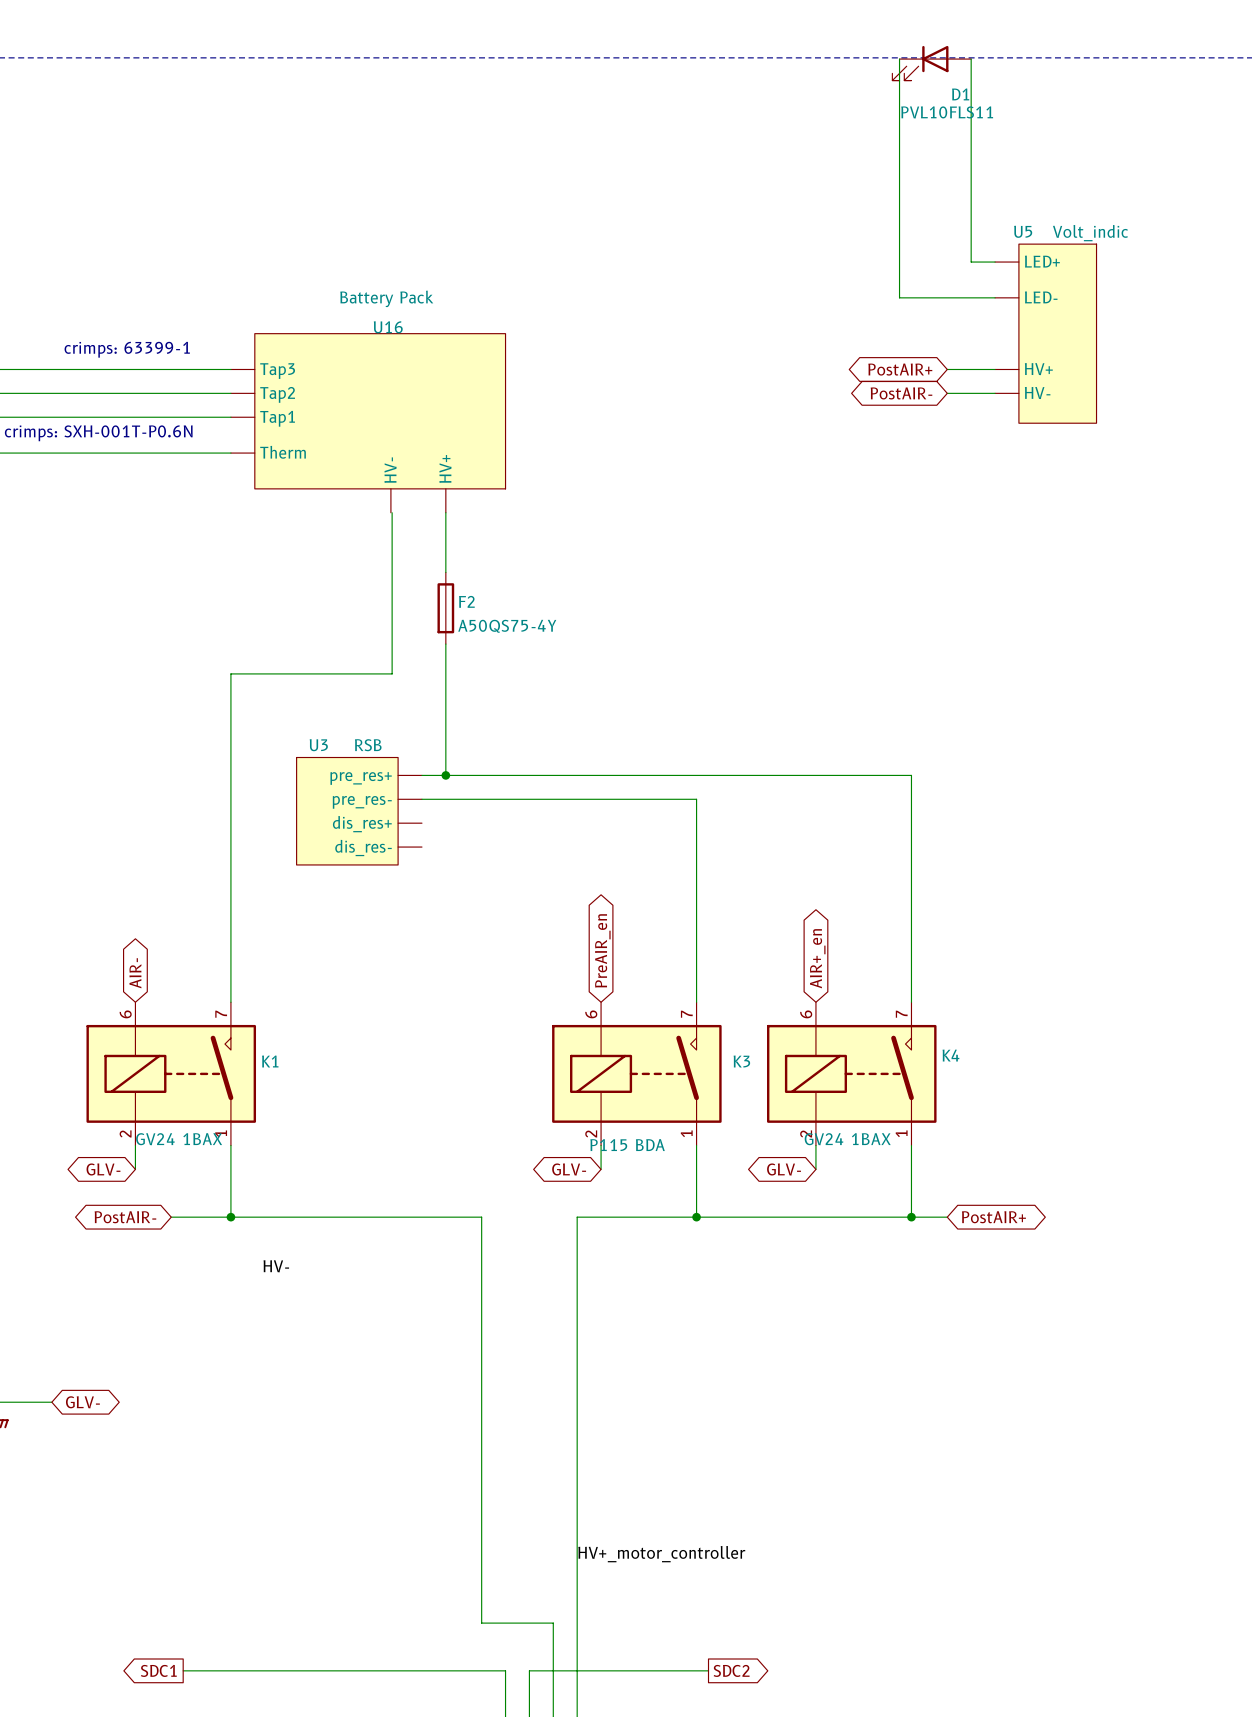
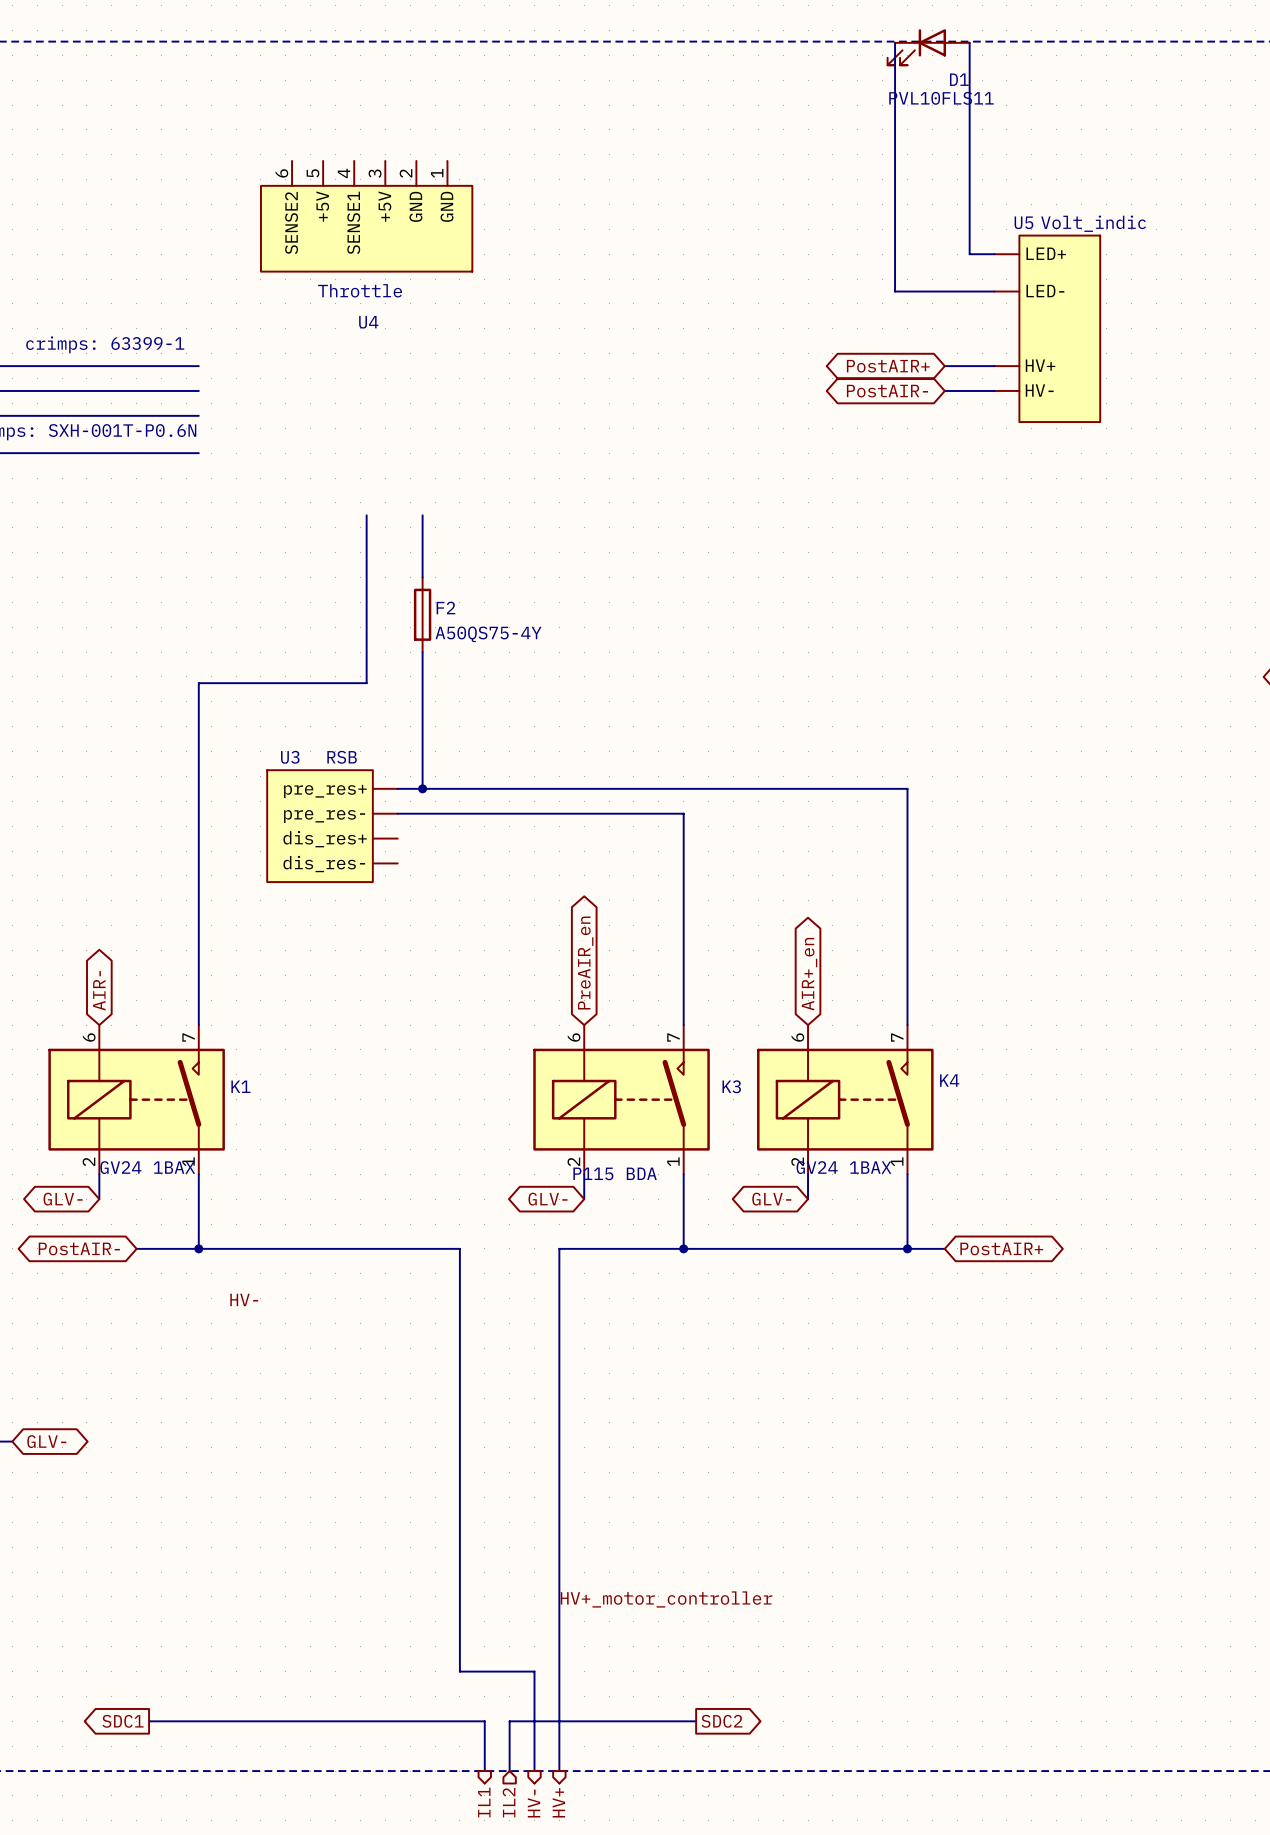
U4: none -> Throttle (366, 216)
U16: Battery Pack (368, 423) -> none

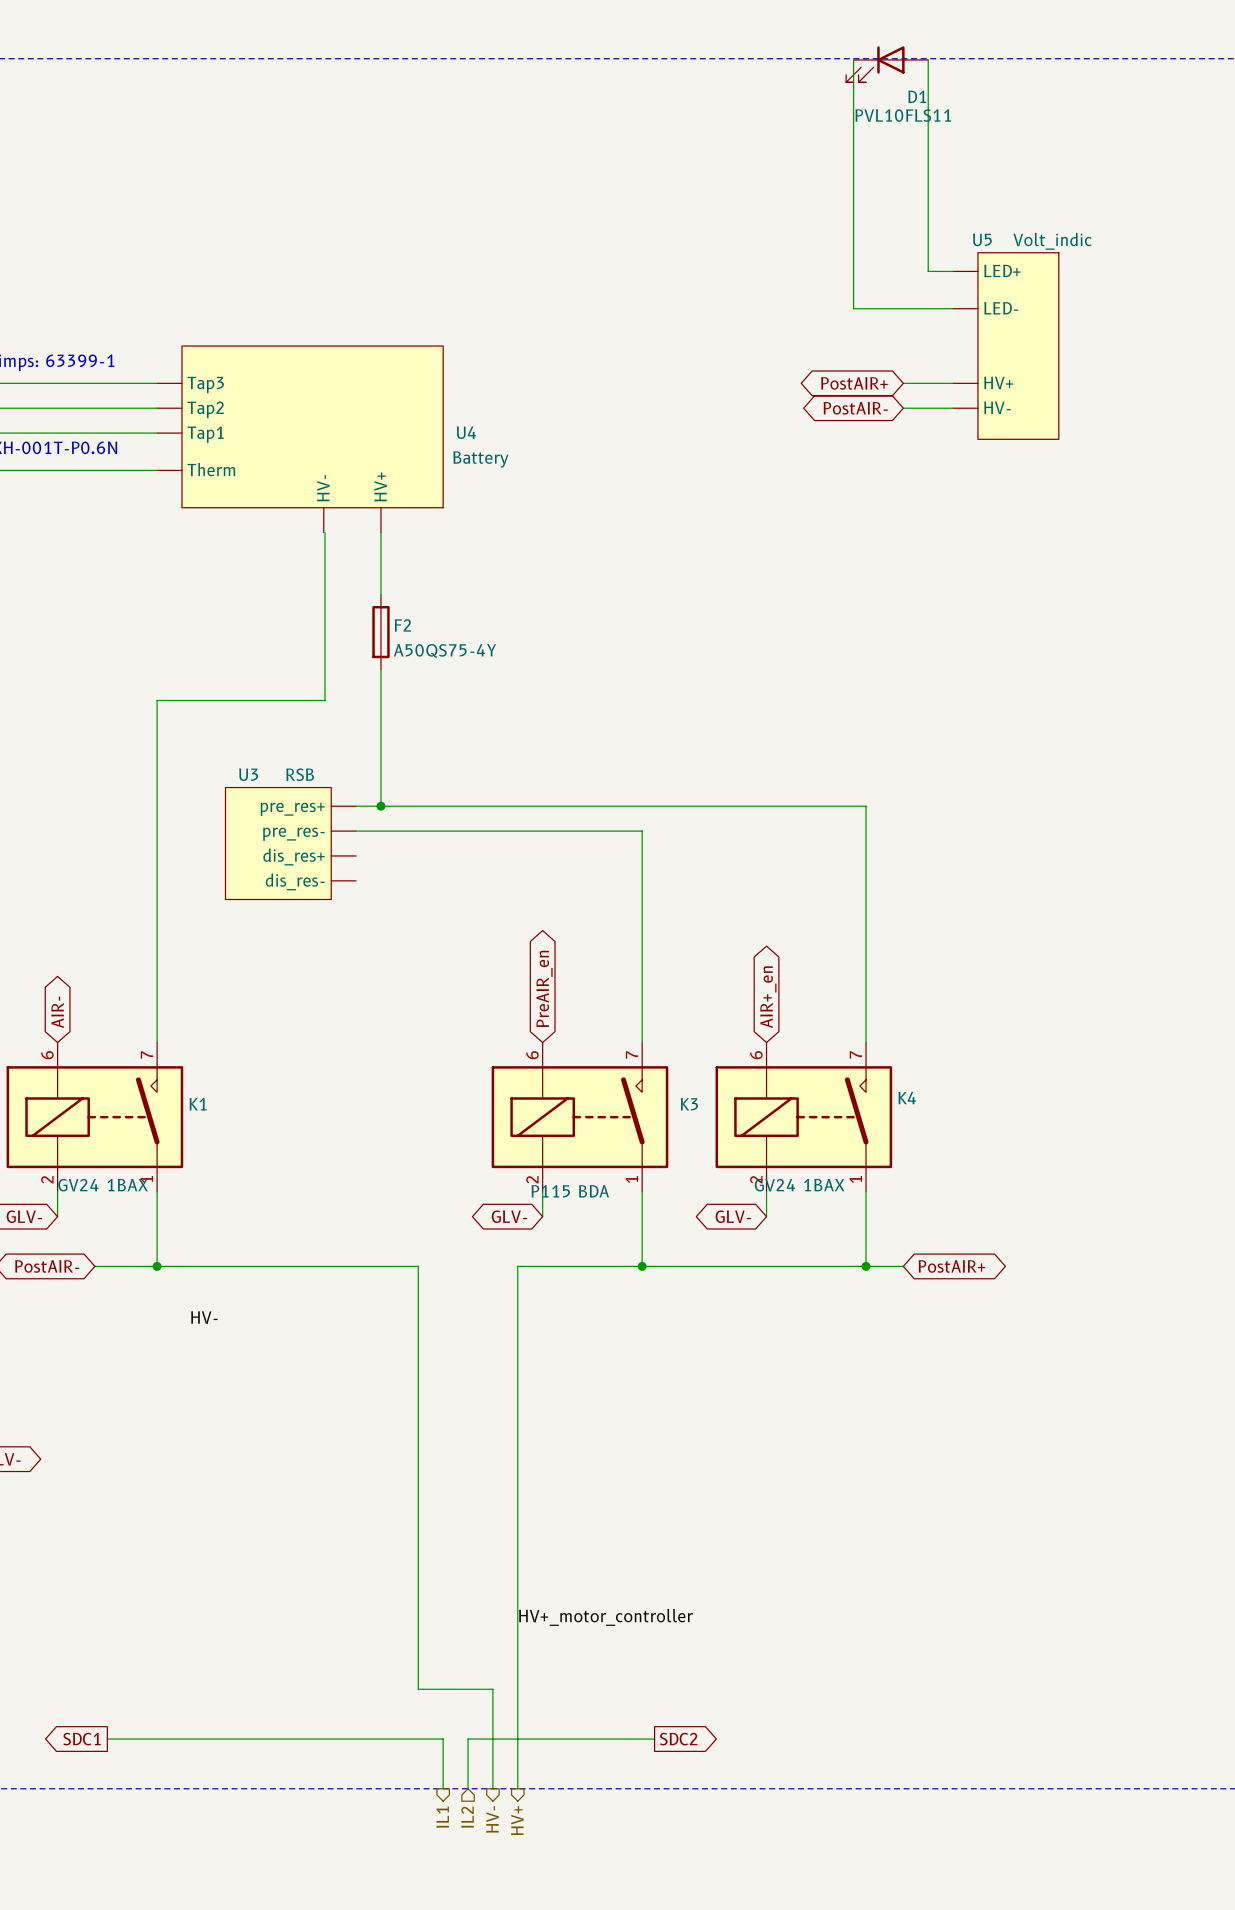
U4 symbol: [260, 160, 473, 272] -> [157, 346, 444, 533]
U4 value: Throttle (360, 290) -> Battery (480, 459)
U4 name position: U4 (368, 322) -> U4 (466, 432)

